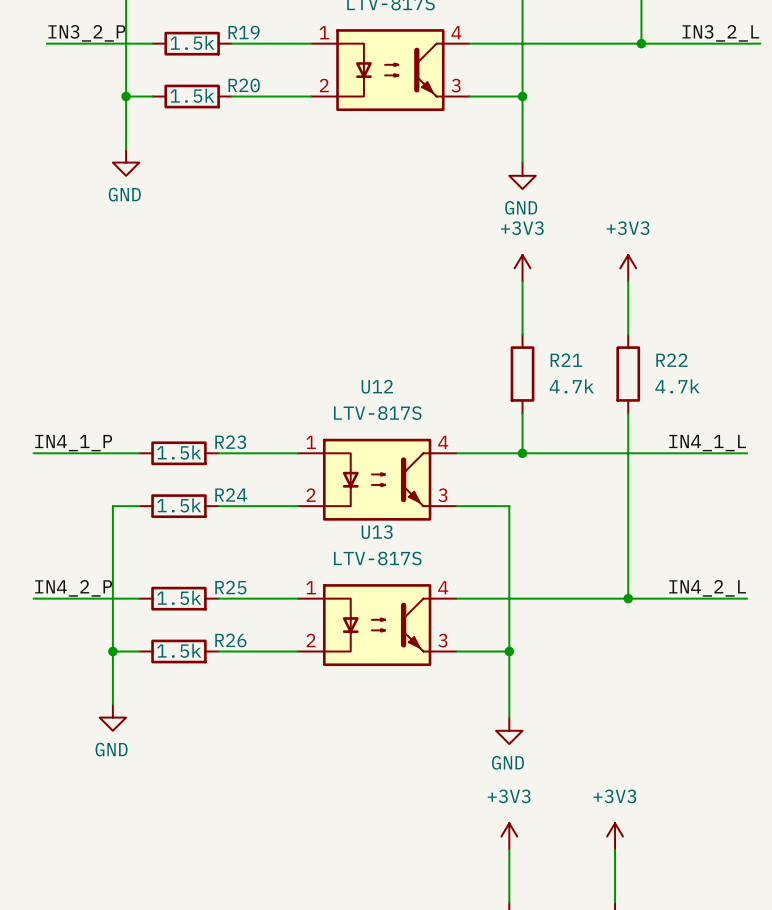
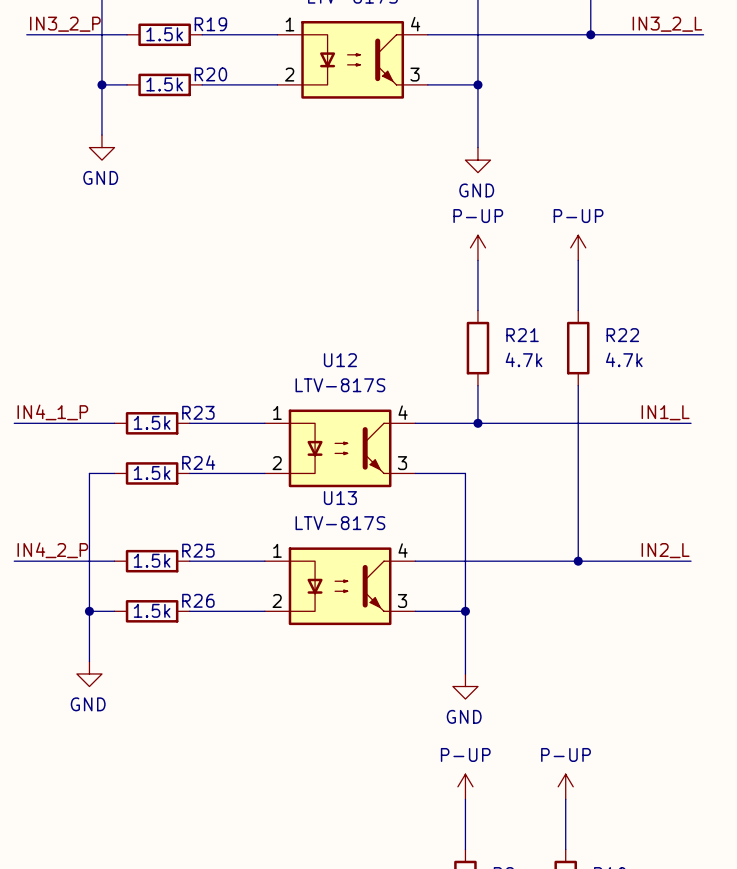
power symbol: +3V3 (522, 268) -> P-UP (477, 247)
power symbol: +3V3 (628, 268) -> P-UP (578, 247)
label: IN4_1_L (707, 443) -> IN1_L (665, 412)
label: IN4_2_L (707, 588) -> IN2_L (665, 550)
power symbol: +3V3 (509, 836) -> P-UP (465, 786)
power symbol: +3V3 (615, 836) -> P-UP (565, 786)

